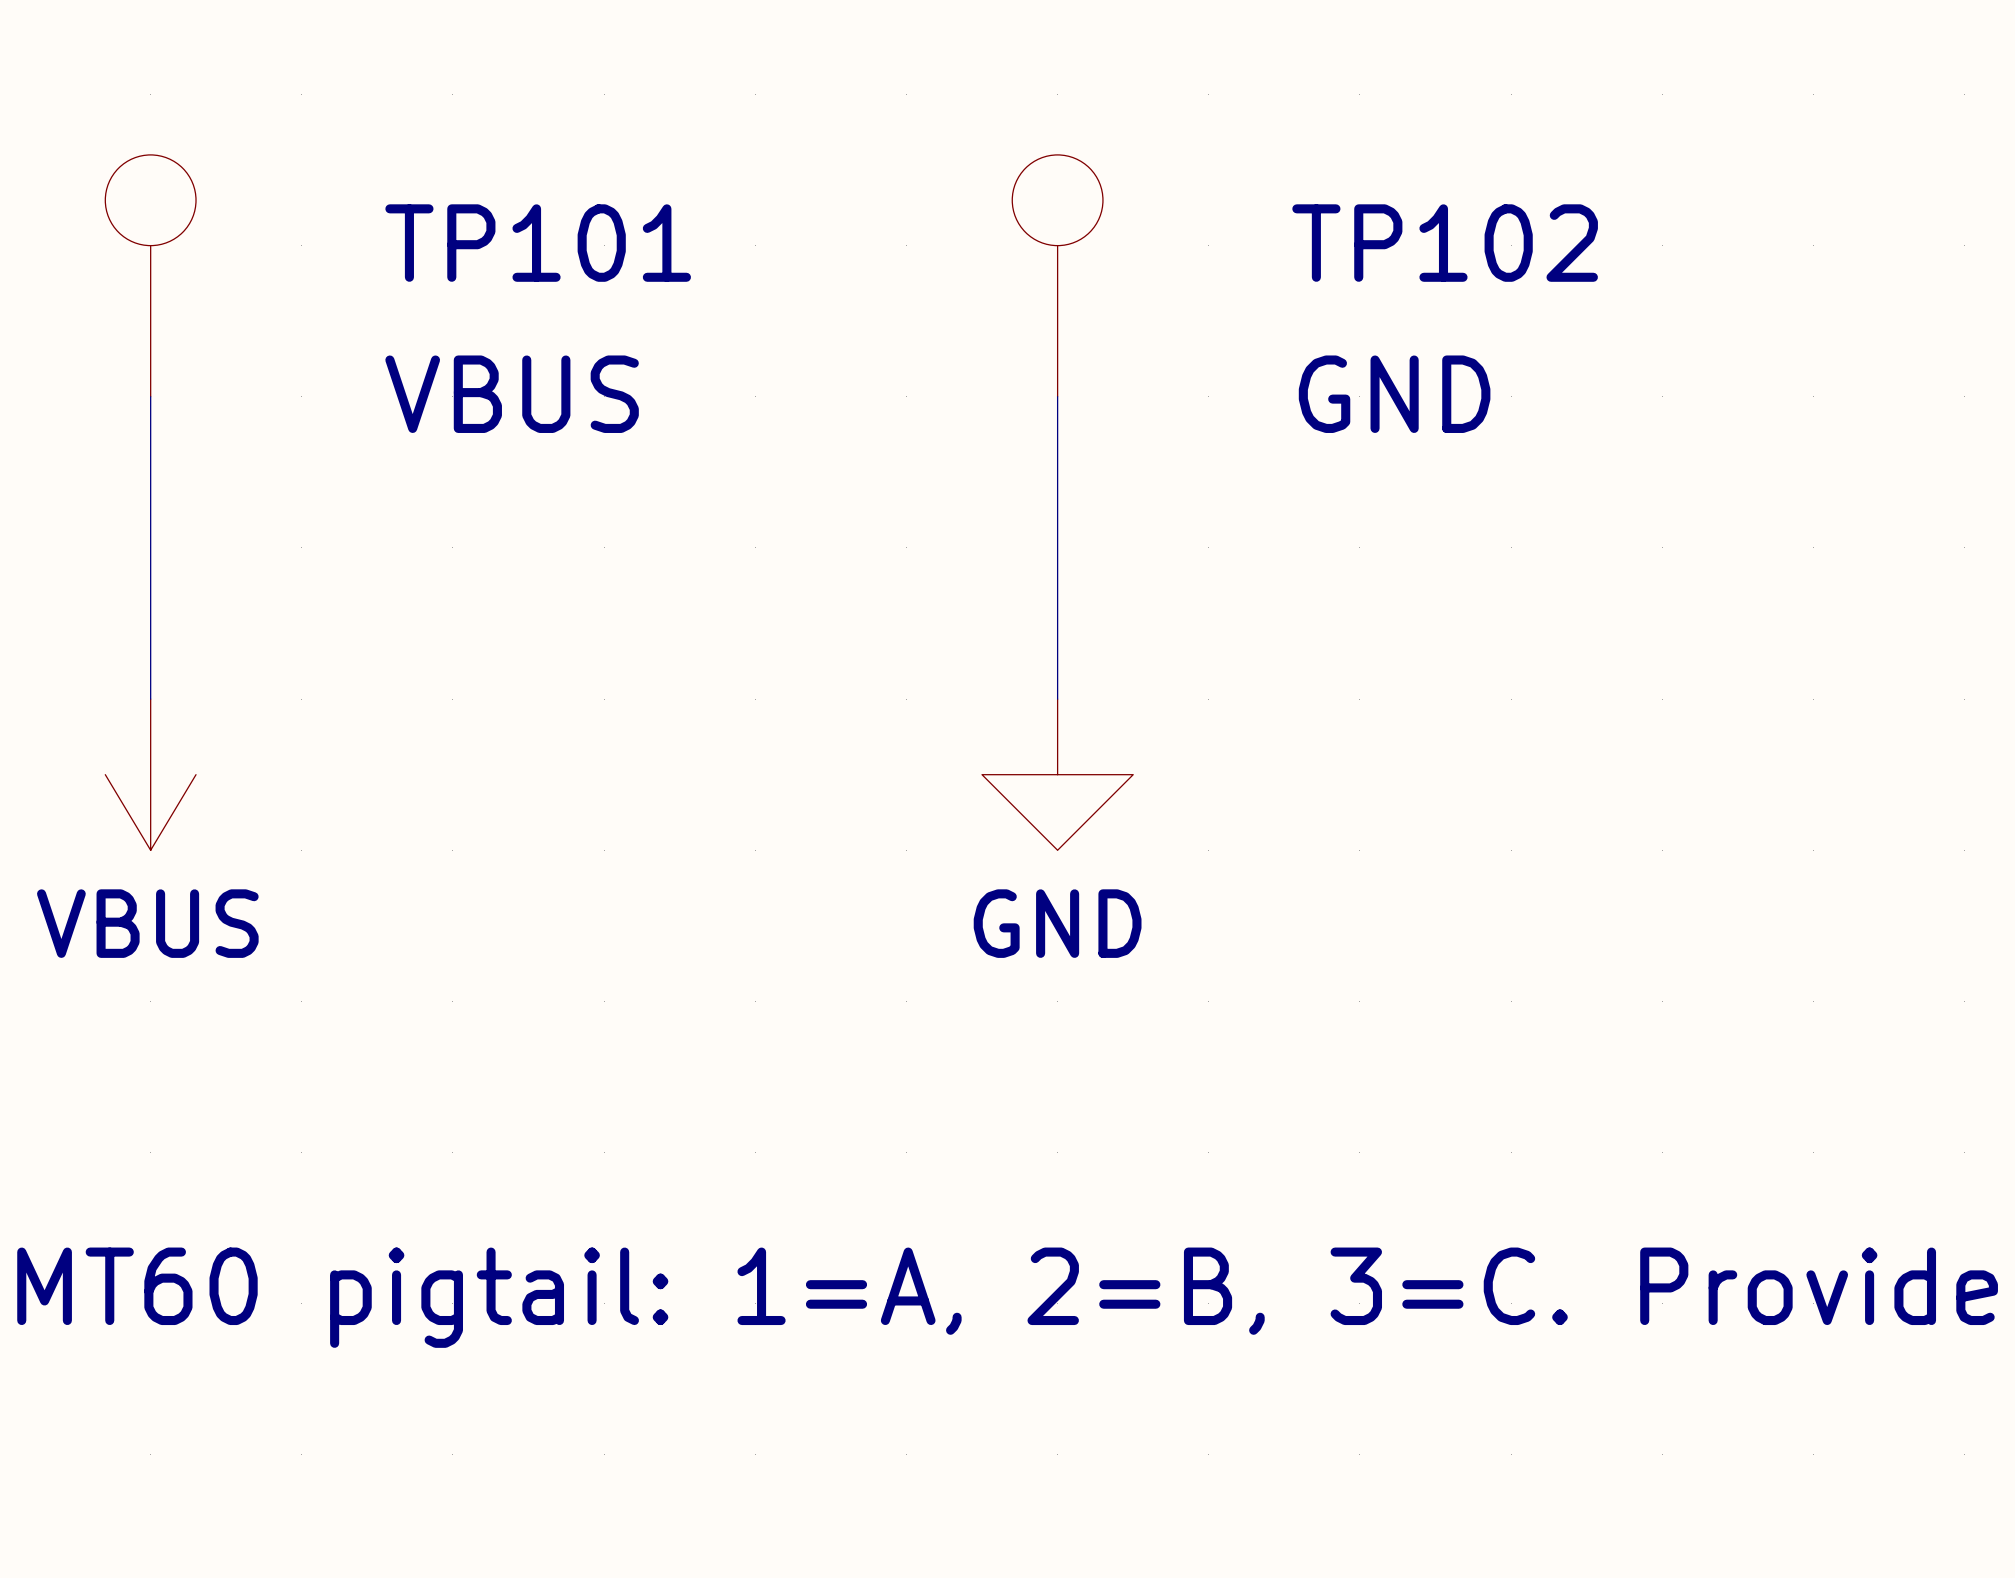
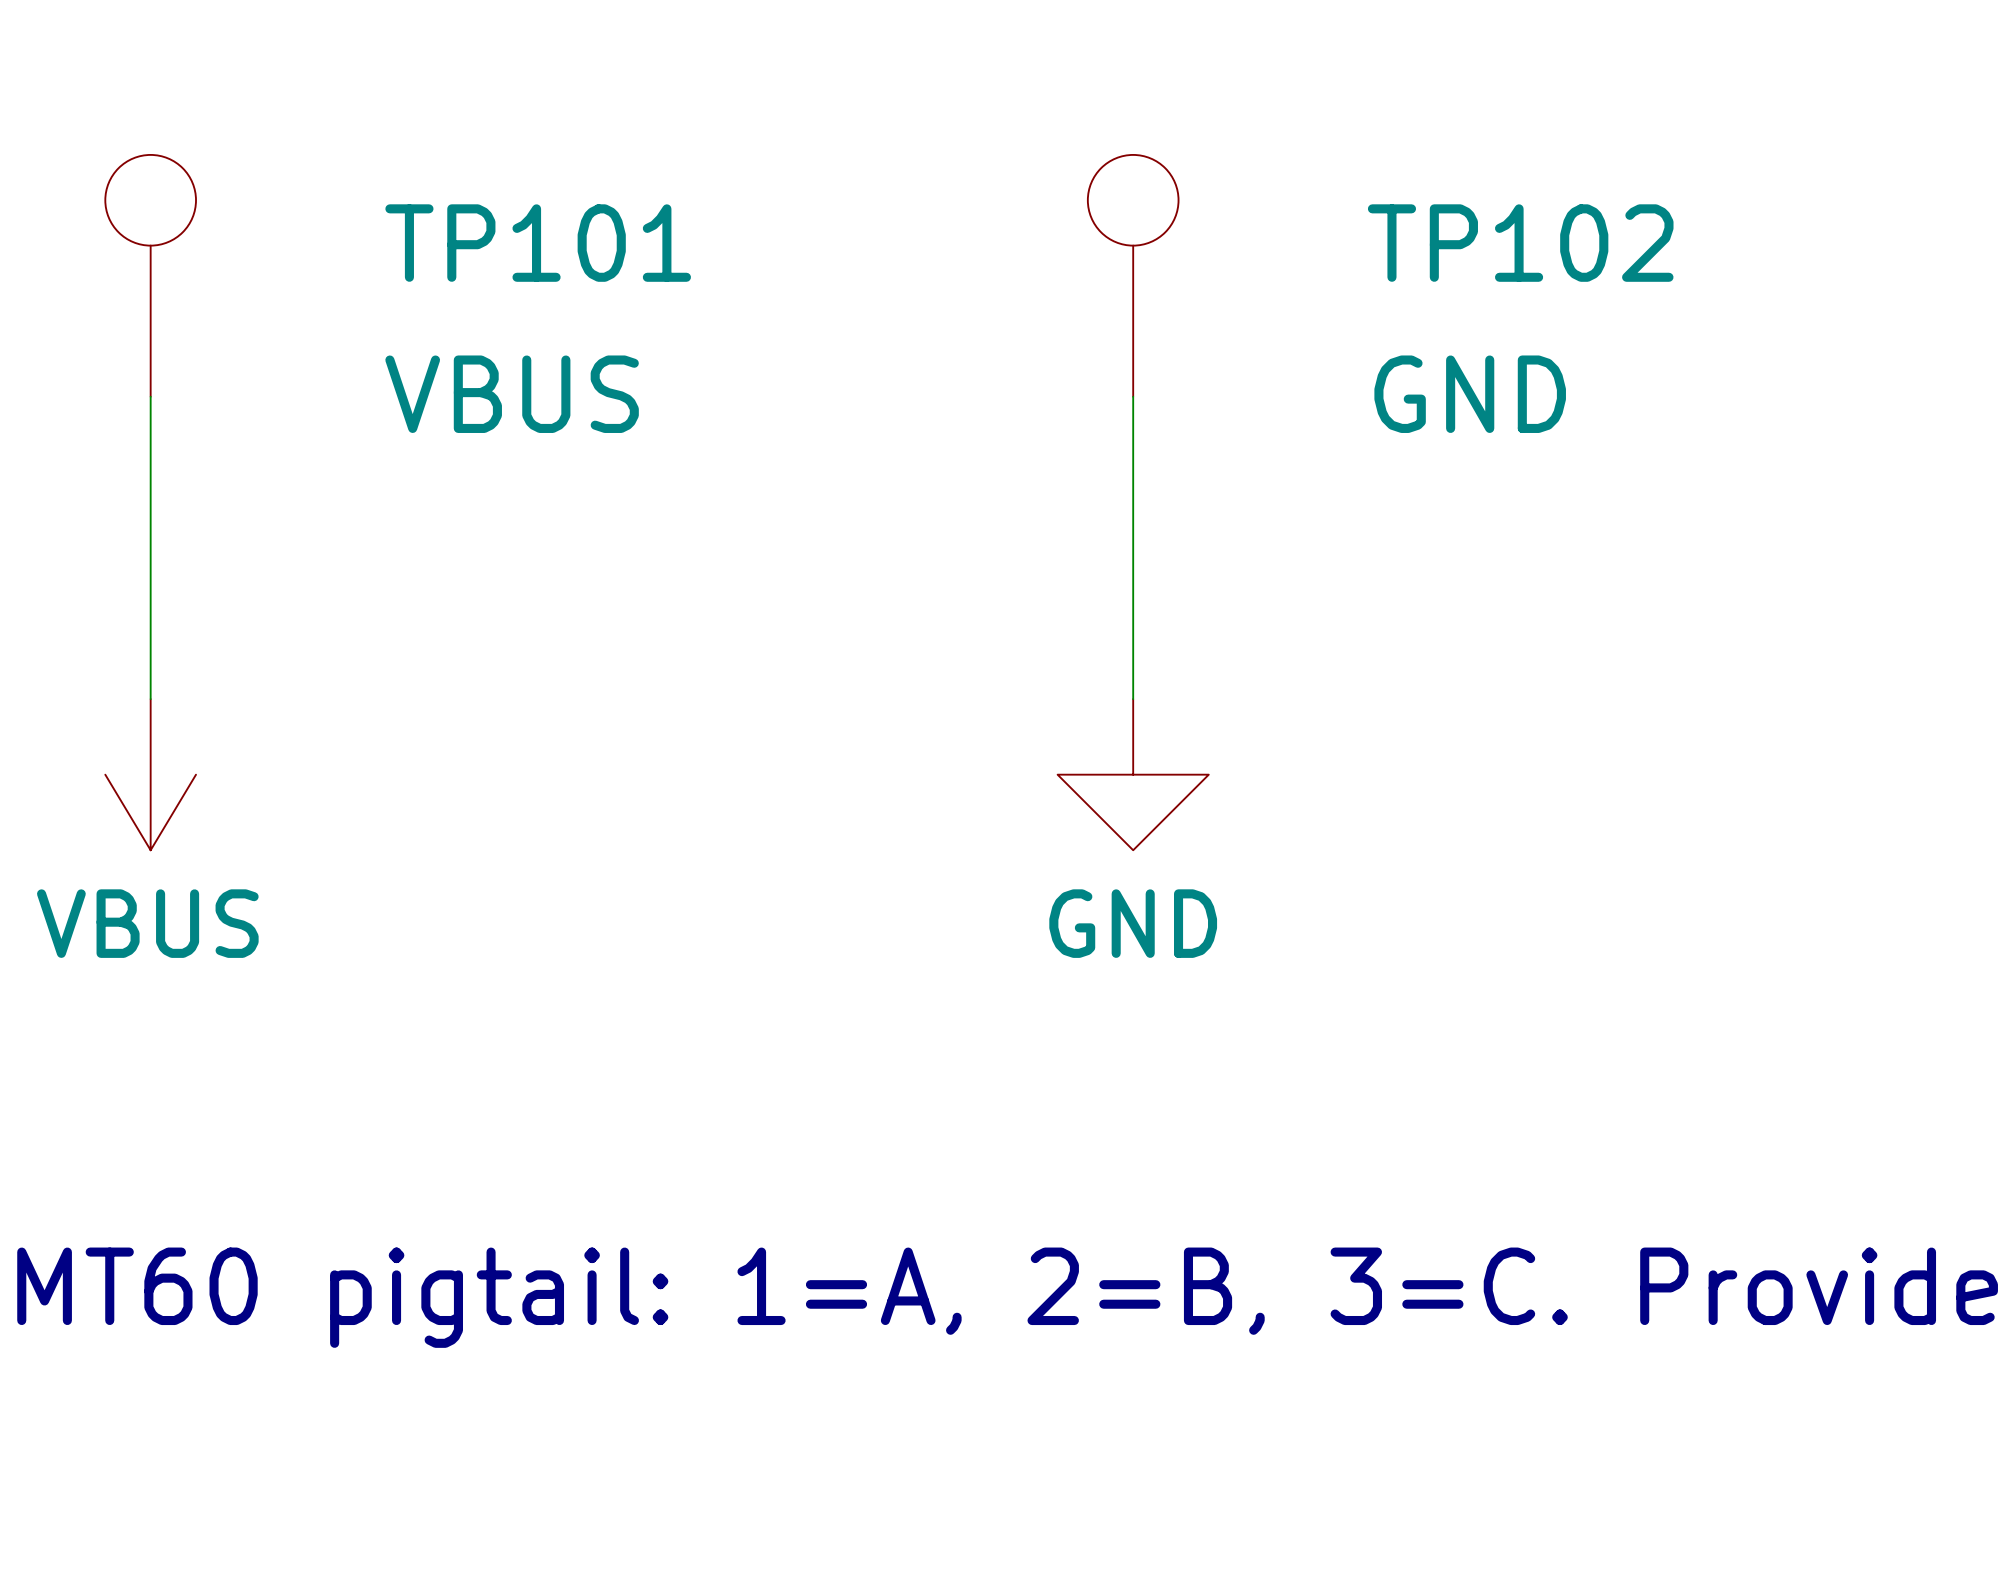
TP102 position: (1057, 275) -> (1133, 275)
wire: (1057, 396) (1057, 699) -> (1133, 396) (1133, 699)
power symbol position: GND (1057, 774) -> GND (1133, 774)

